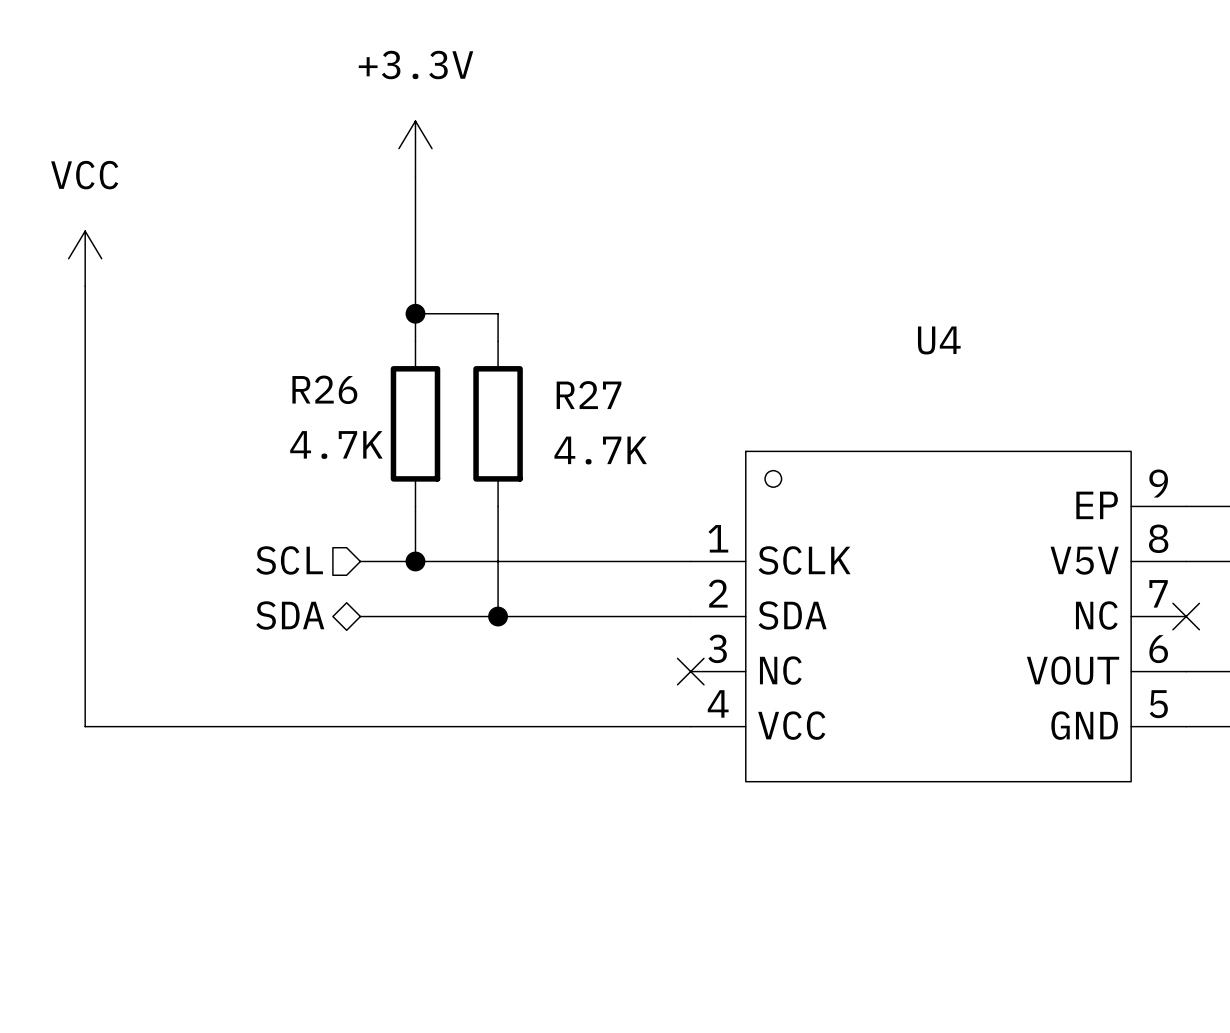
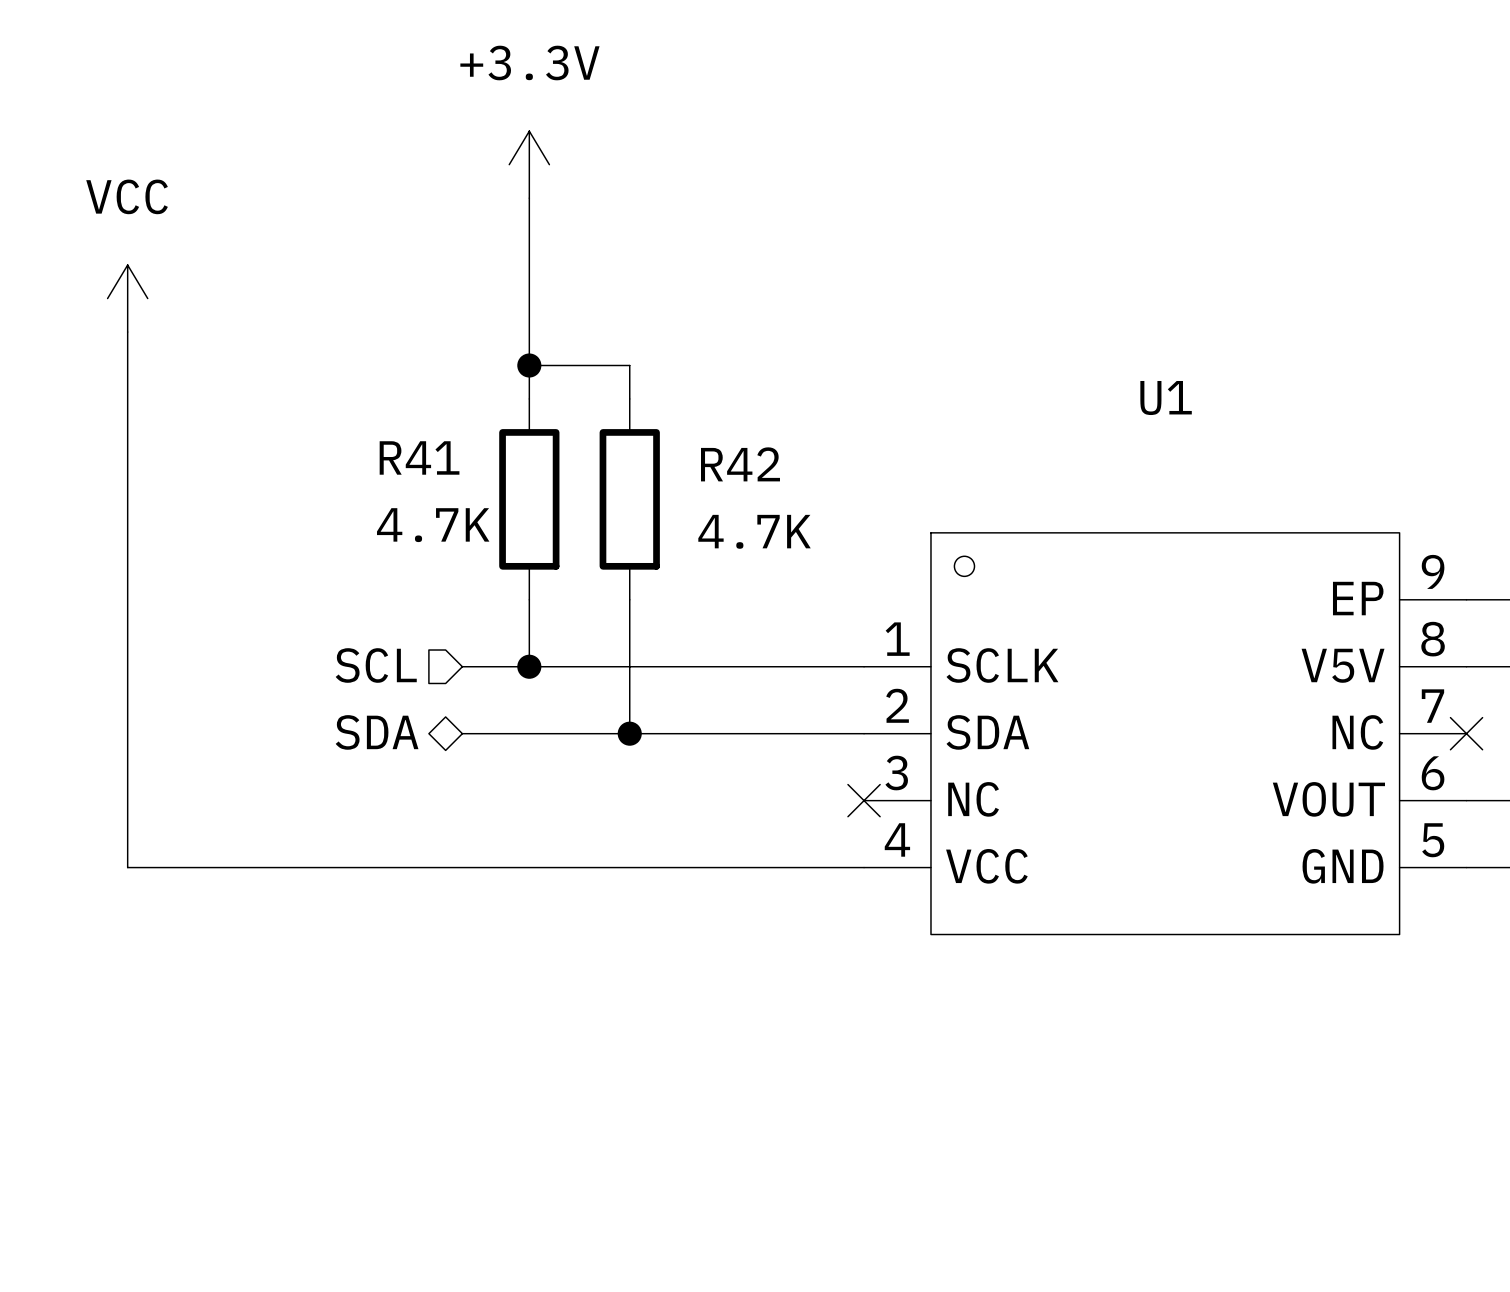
U4 name: U4 (939, 340) -> U1 (1166, 398)
R26 name: R26 (324, 389) -> R41 (419, 457)
R27 name: R27 (589, 395) -> R42 (740, 464)

